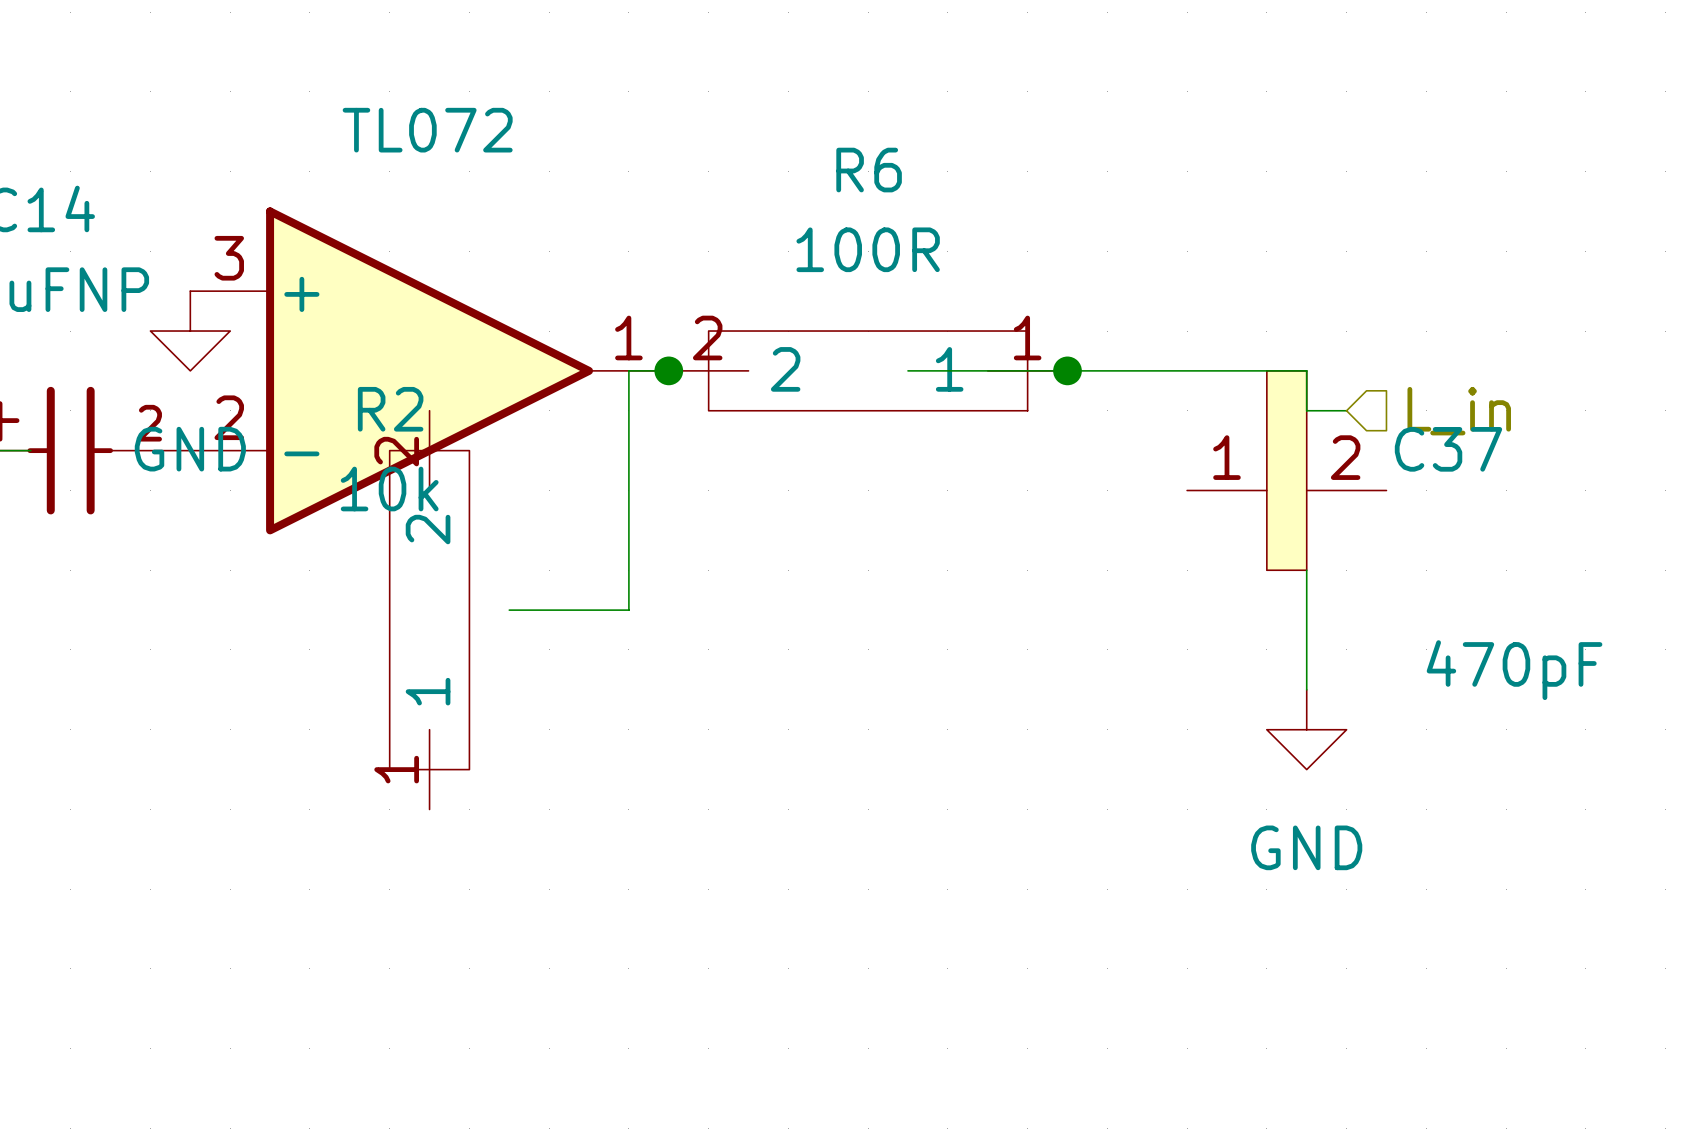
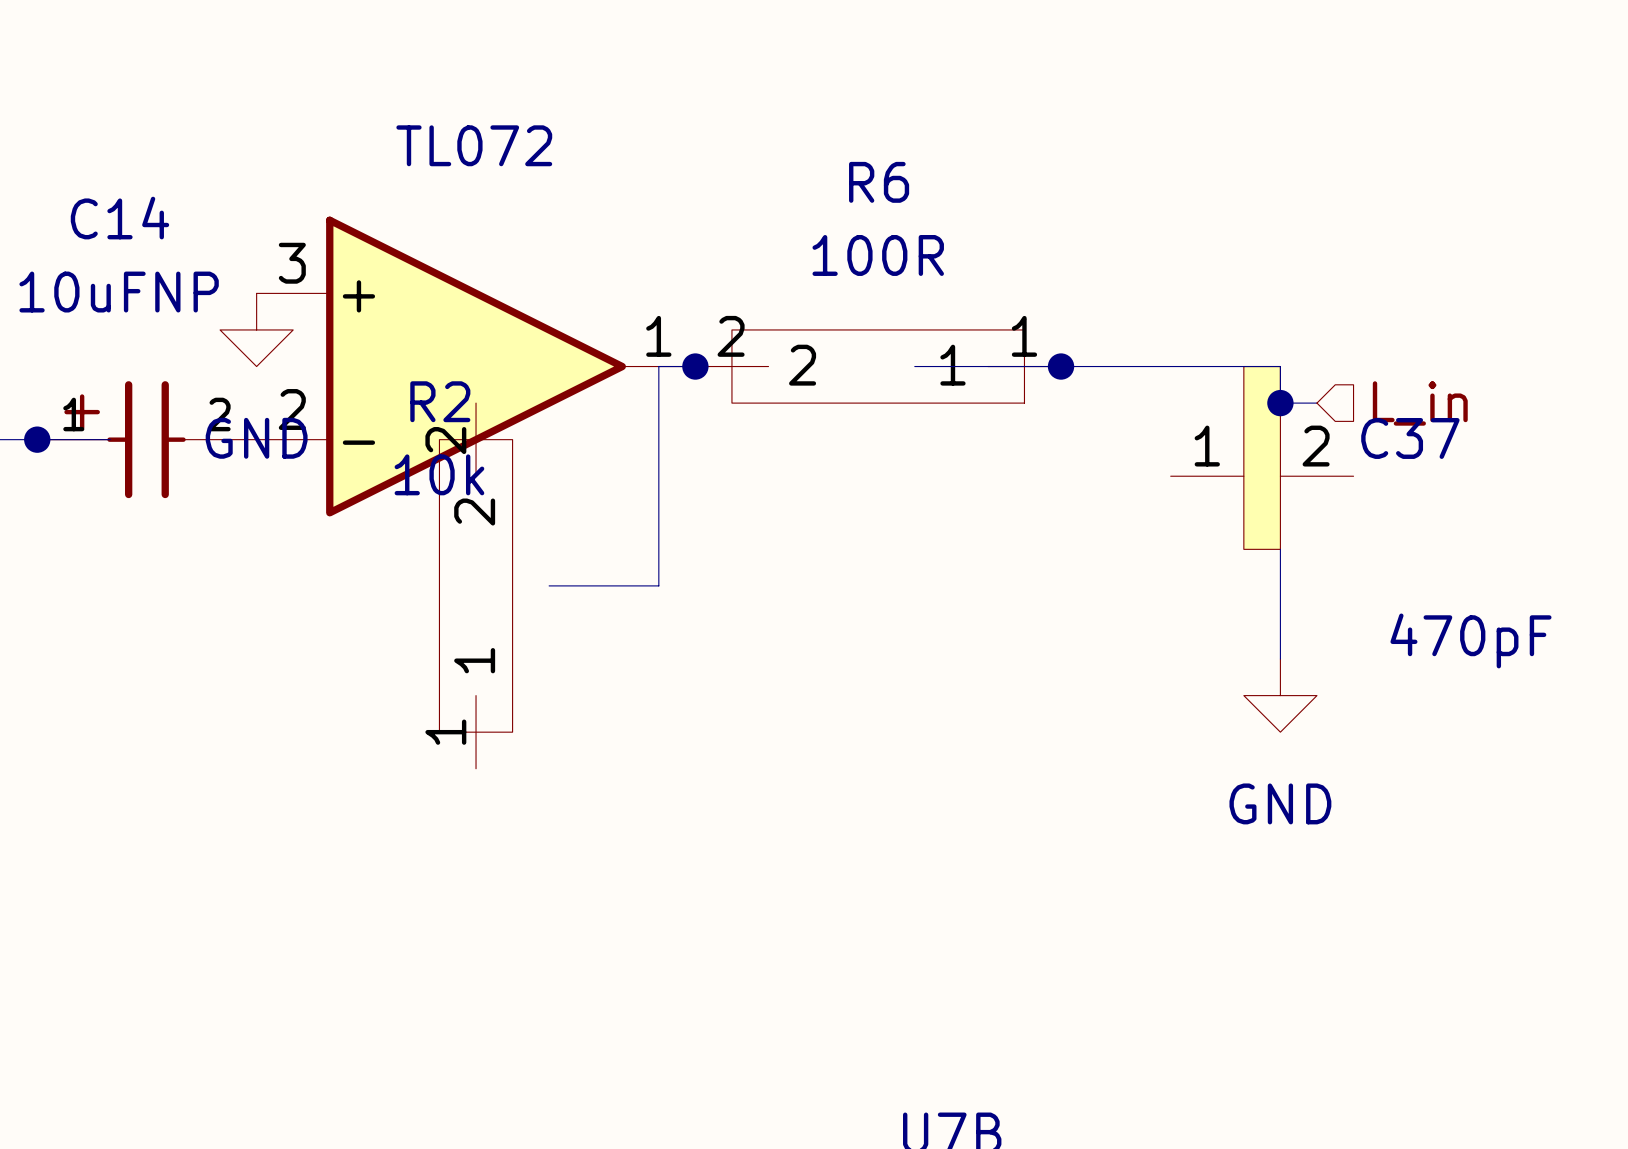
junction: none -> (1280, 403)

